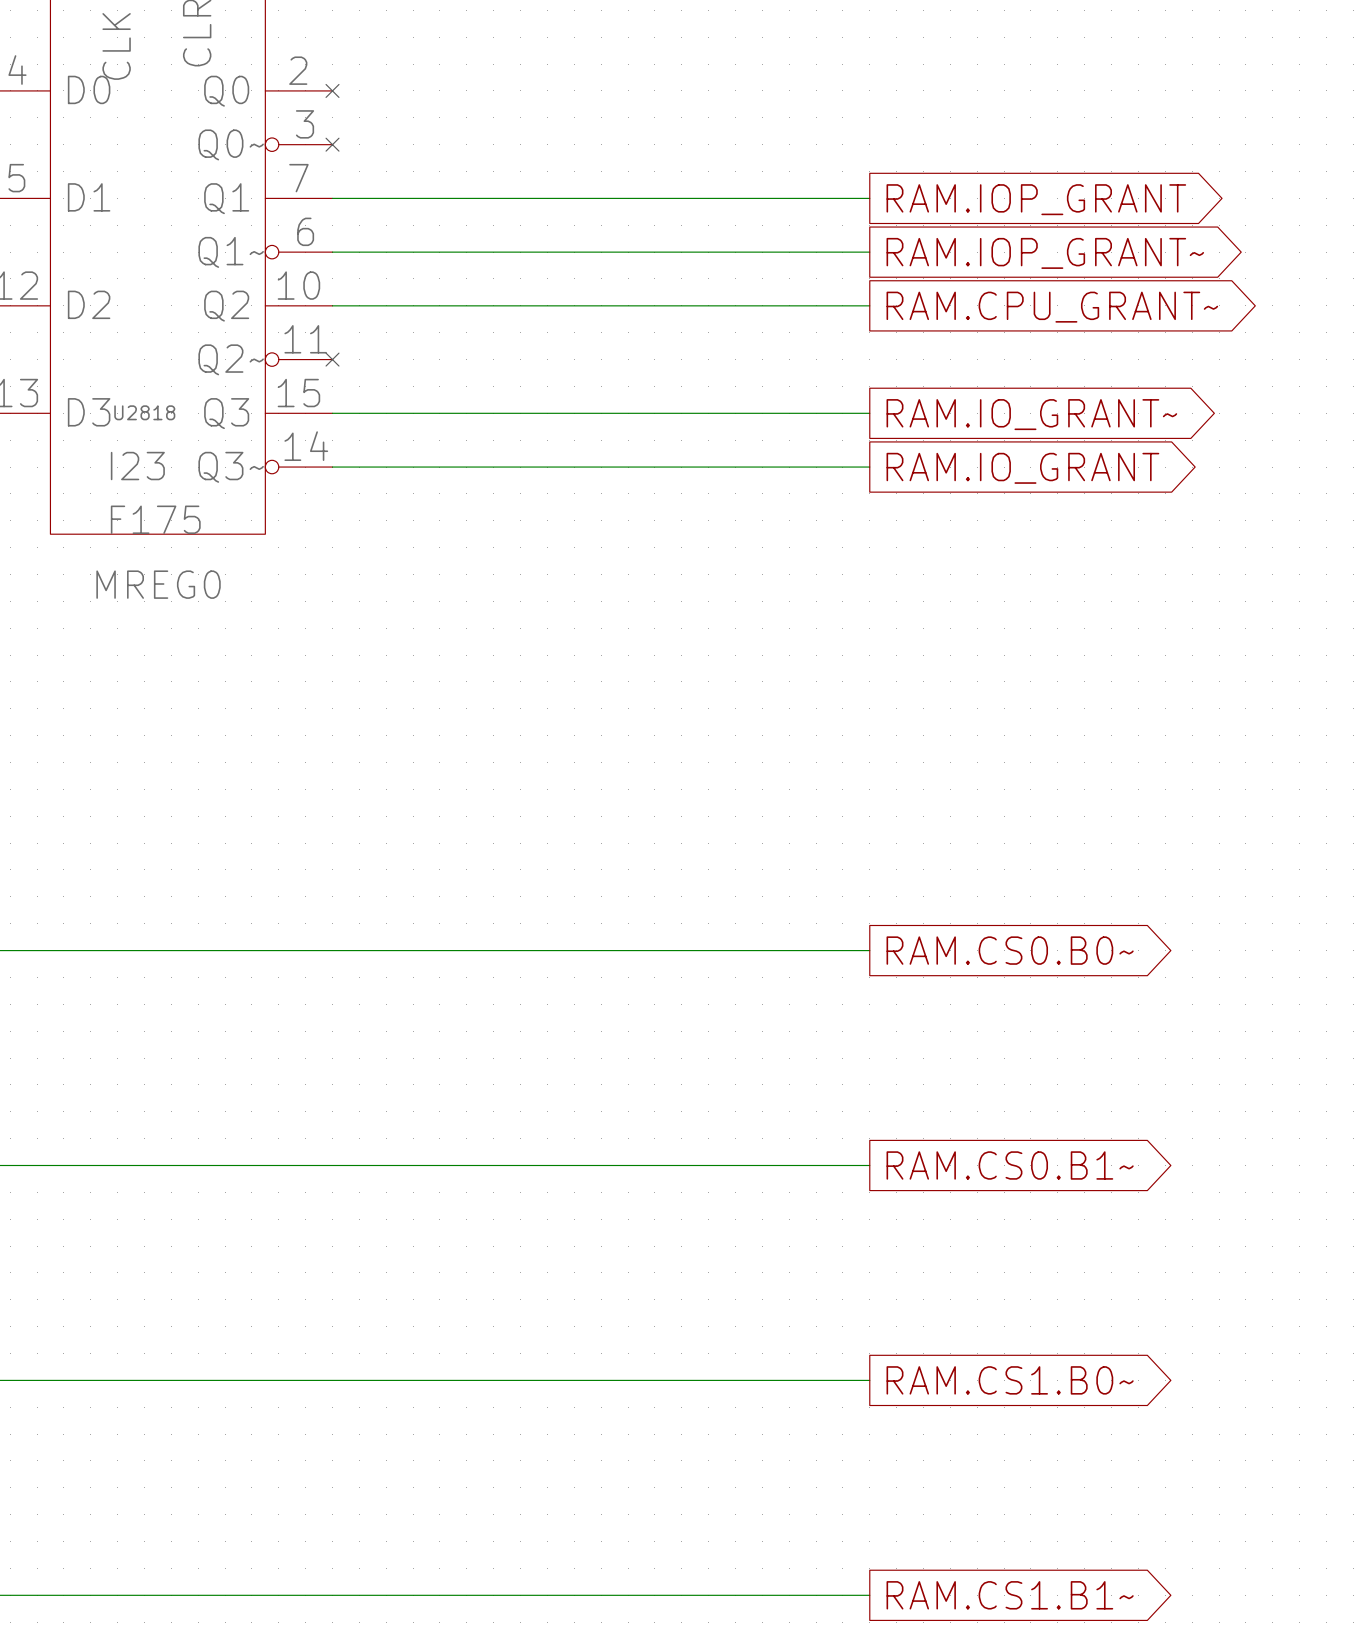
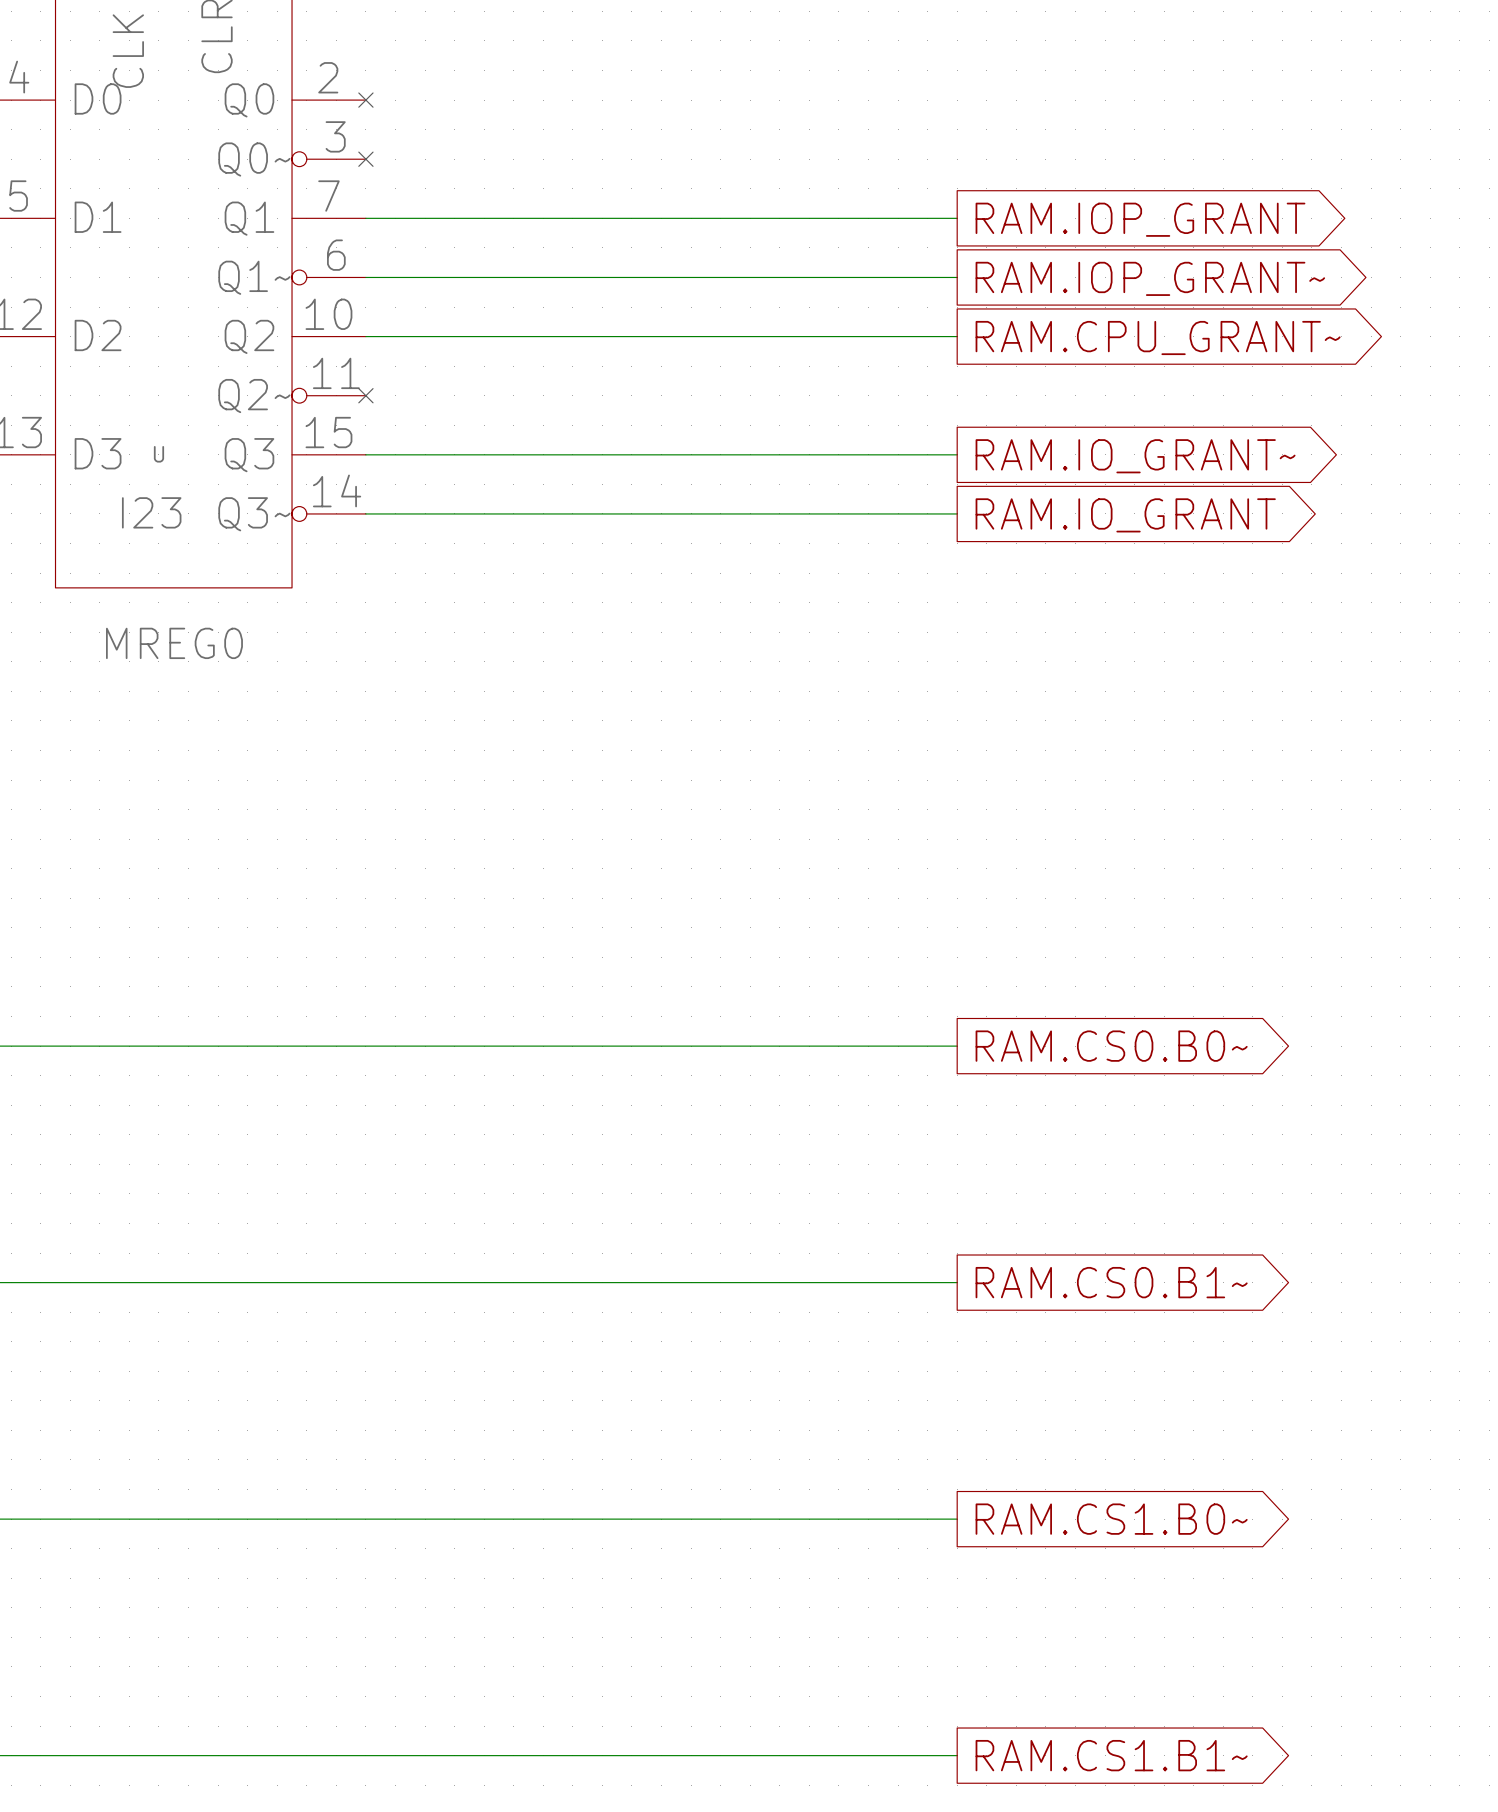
U2818 name: U2818 (144, 412) -> U (158, 454)
U2818 value: F175 (155, 519) -> none

